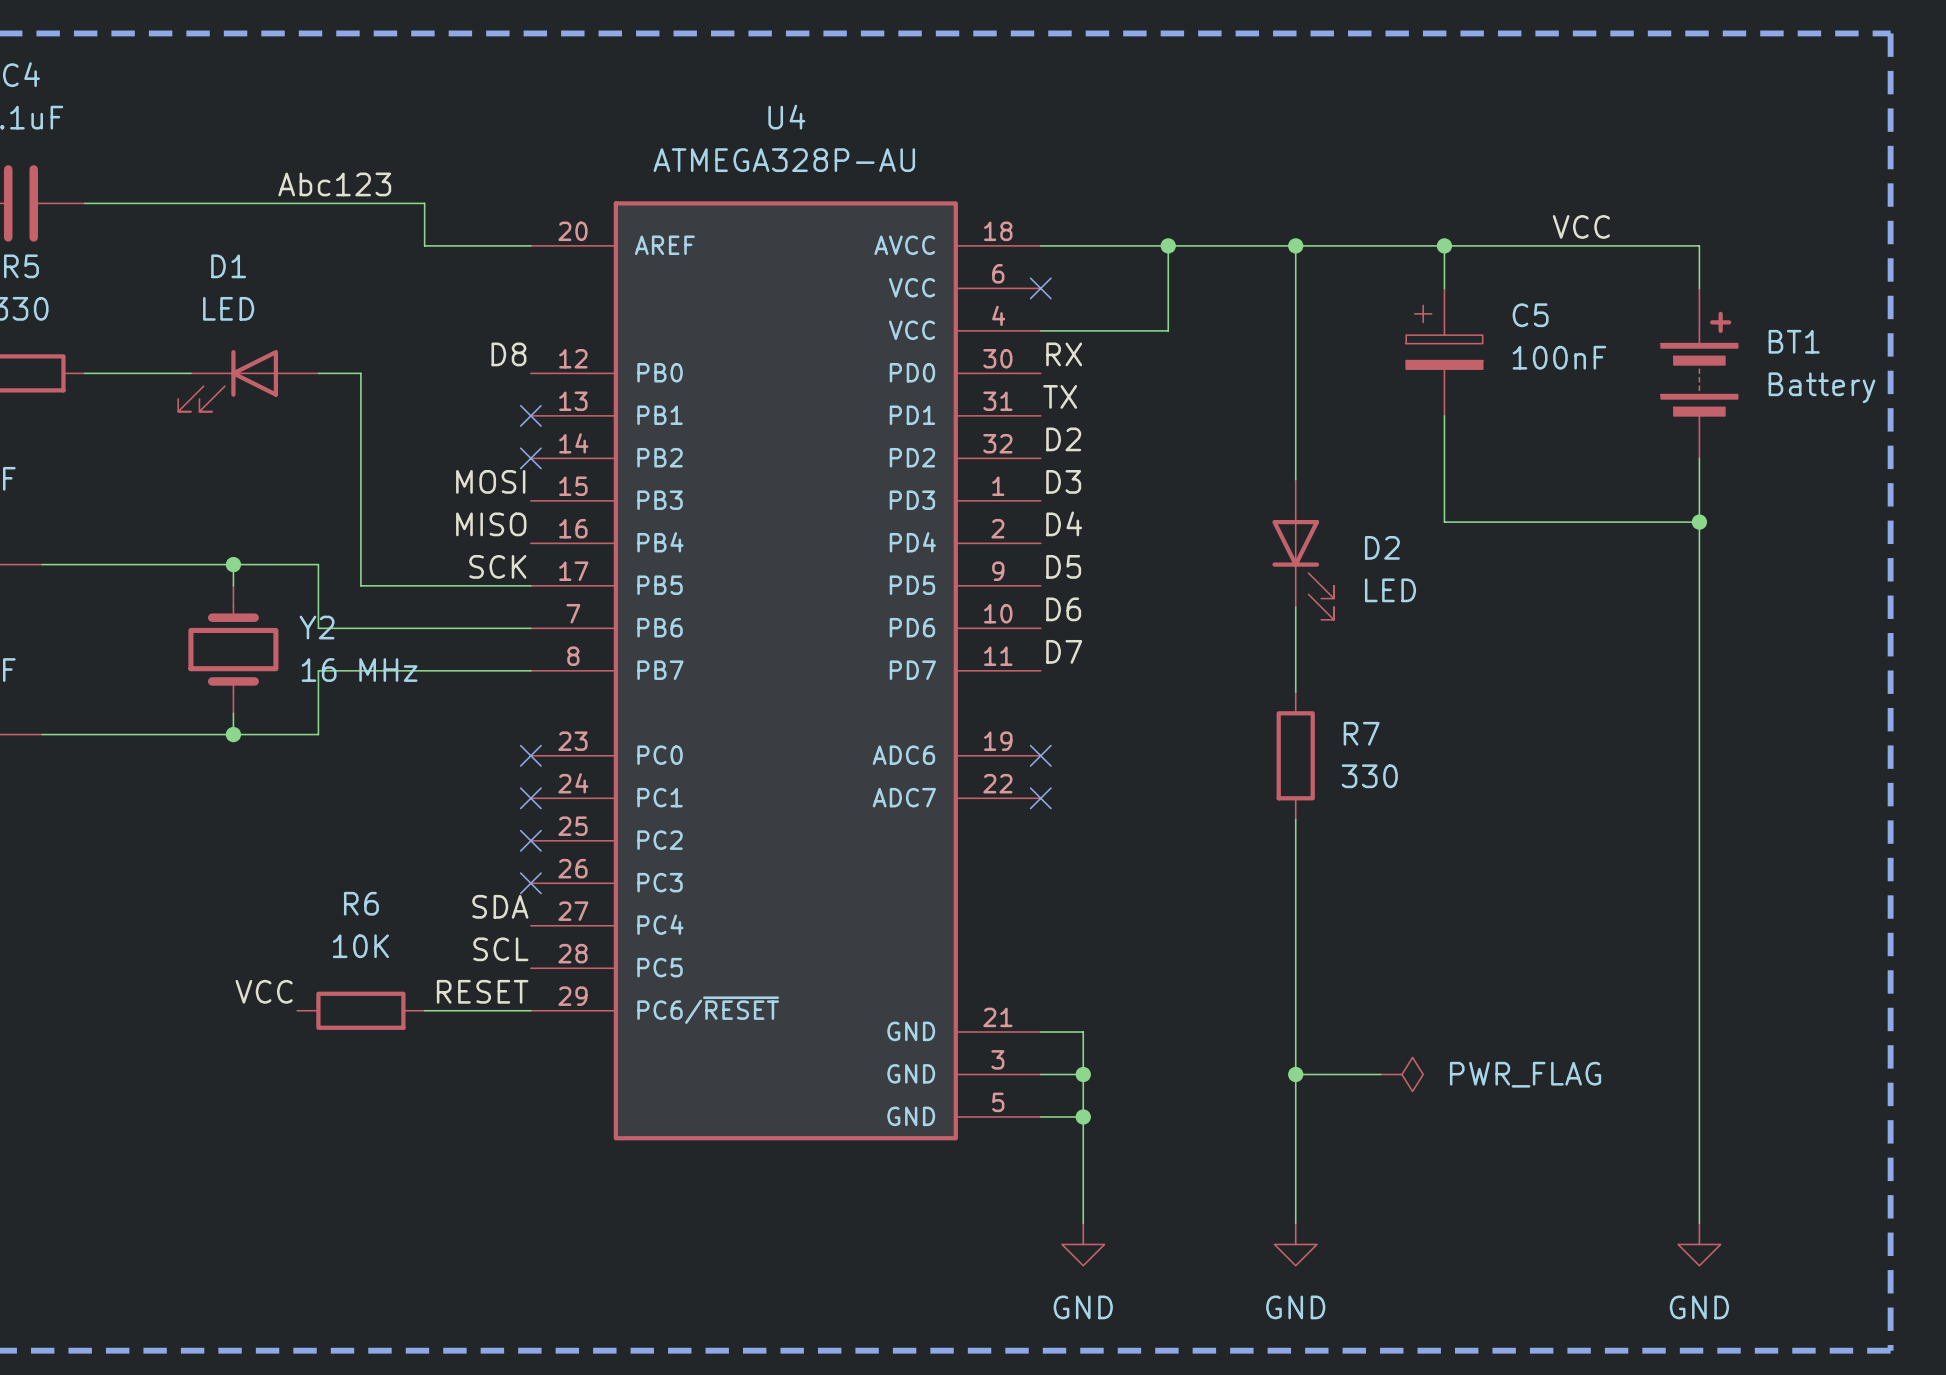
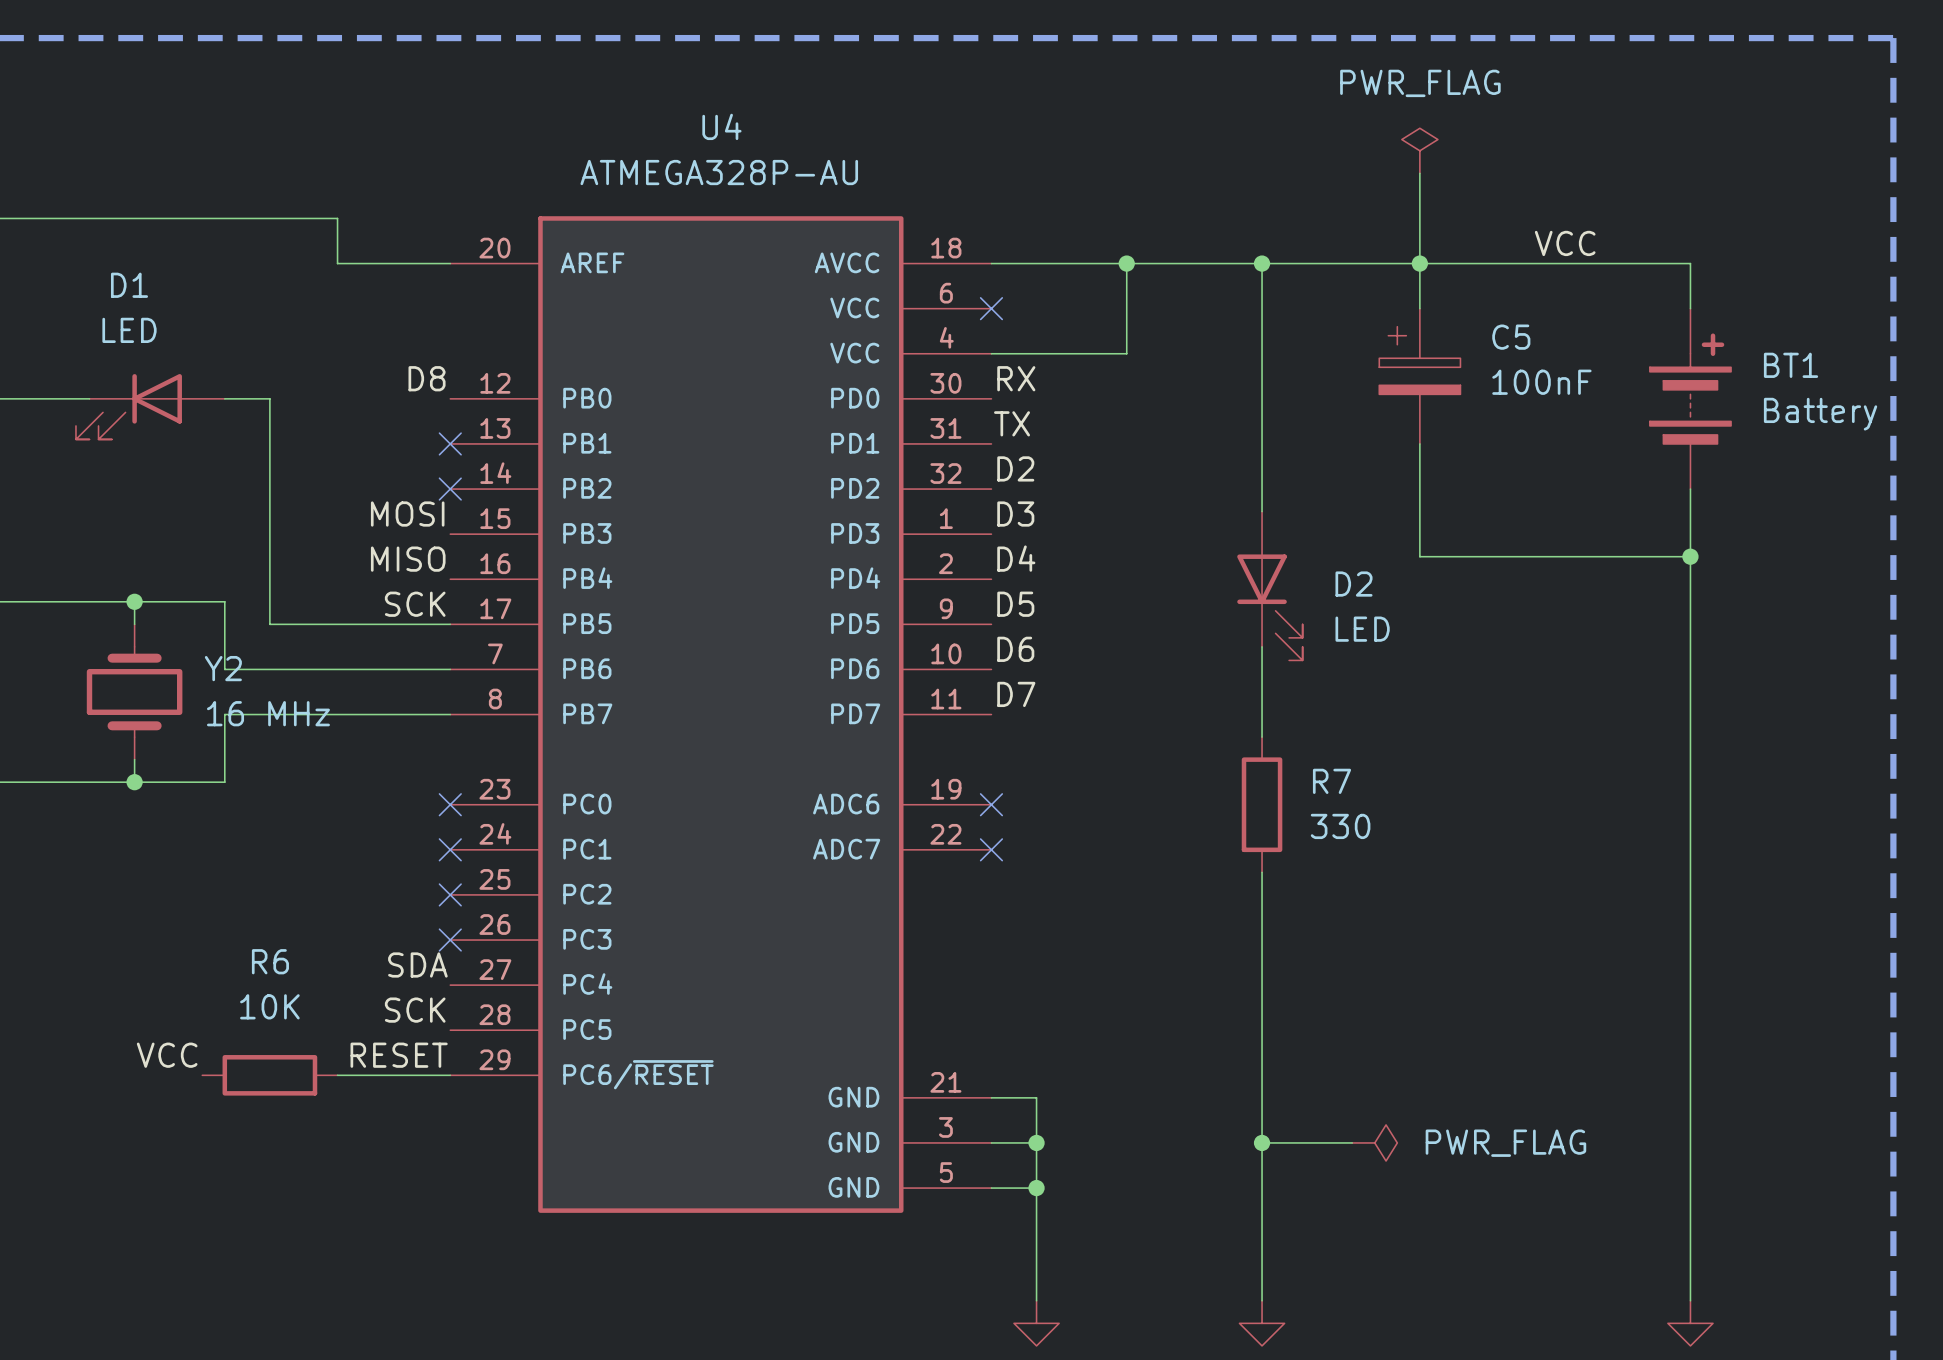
power symbol: none -> PWR_FLAG (1419, 150)
wire: none -> (1419, 173) (1419, 263)
label: Abc123 (334, 184) -> none
label: SCL (500, 949) -> SCK (415, 1010)

